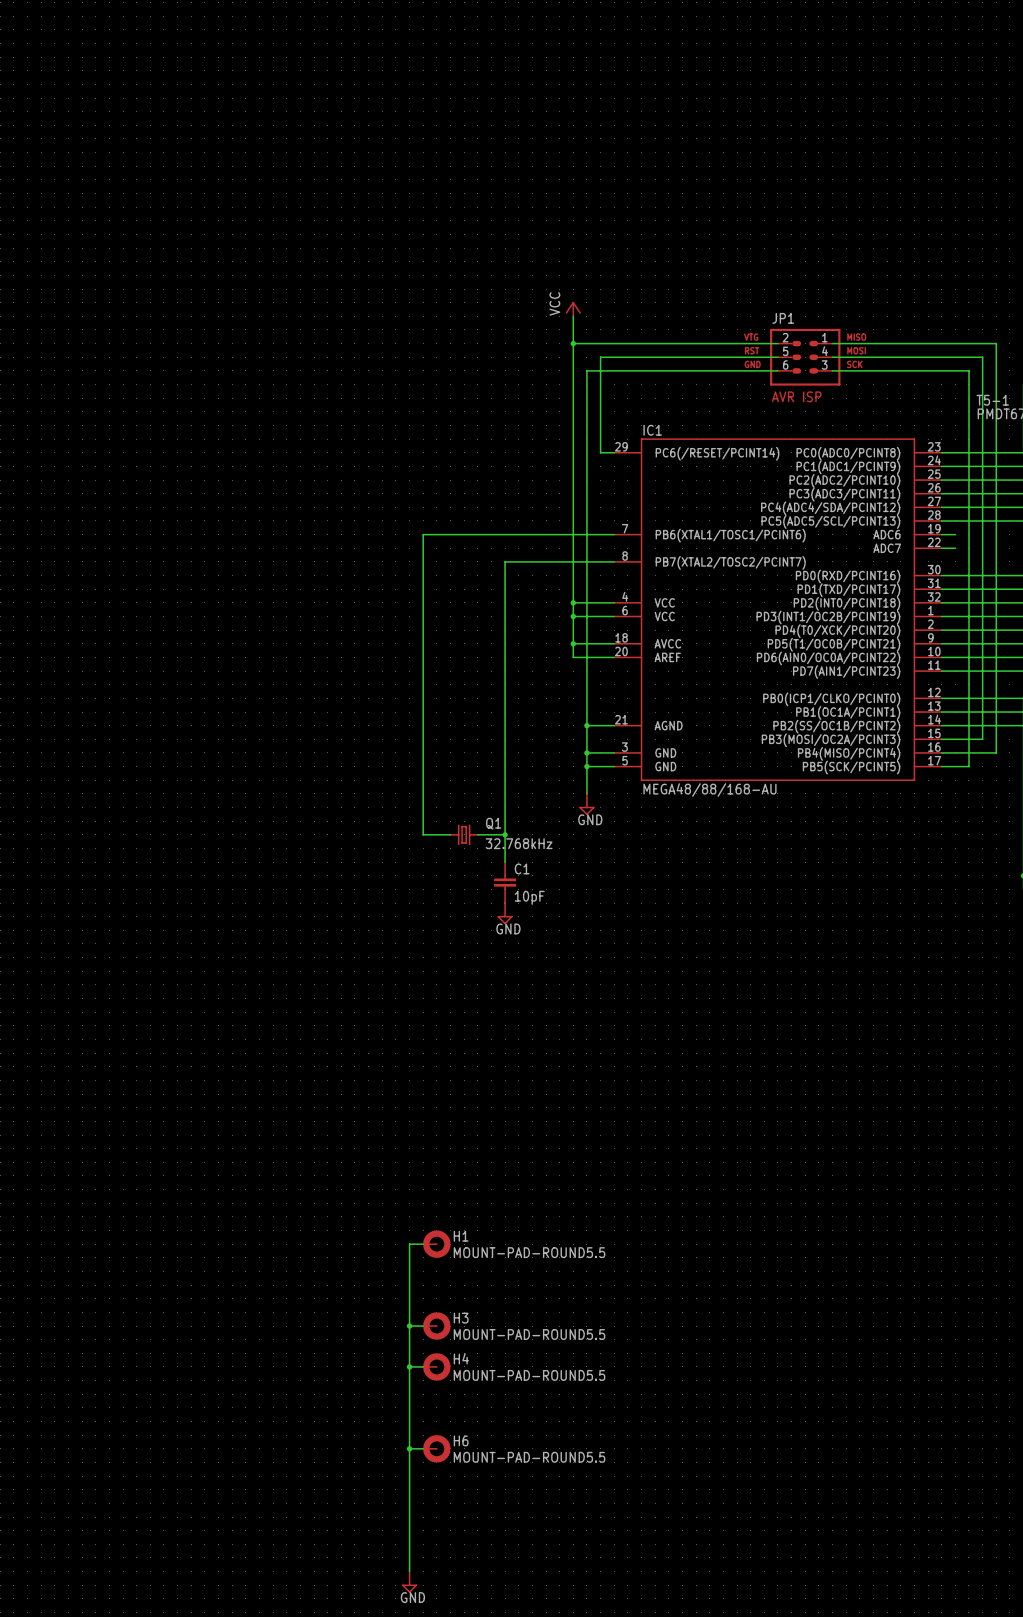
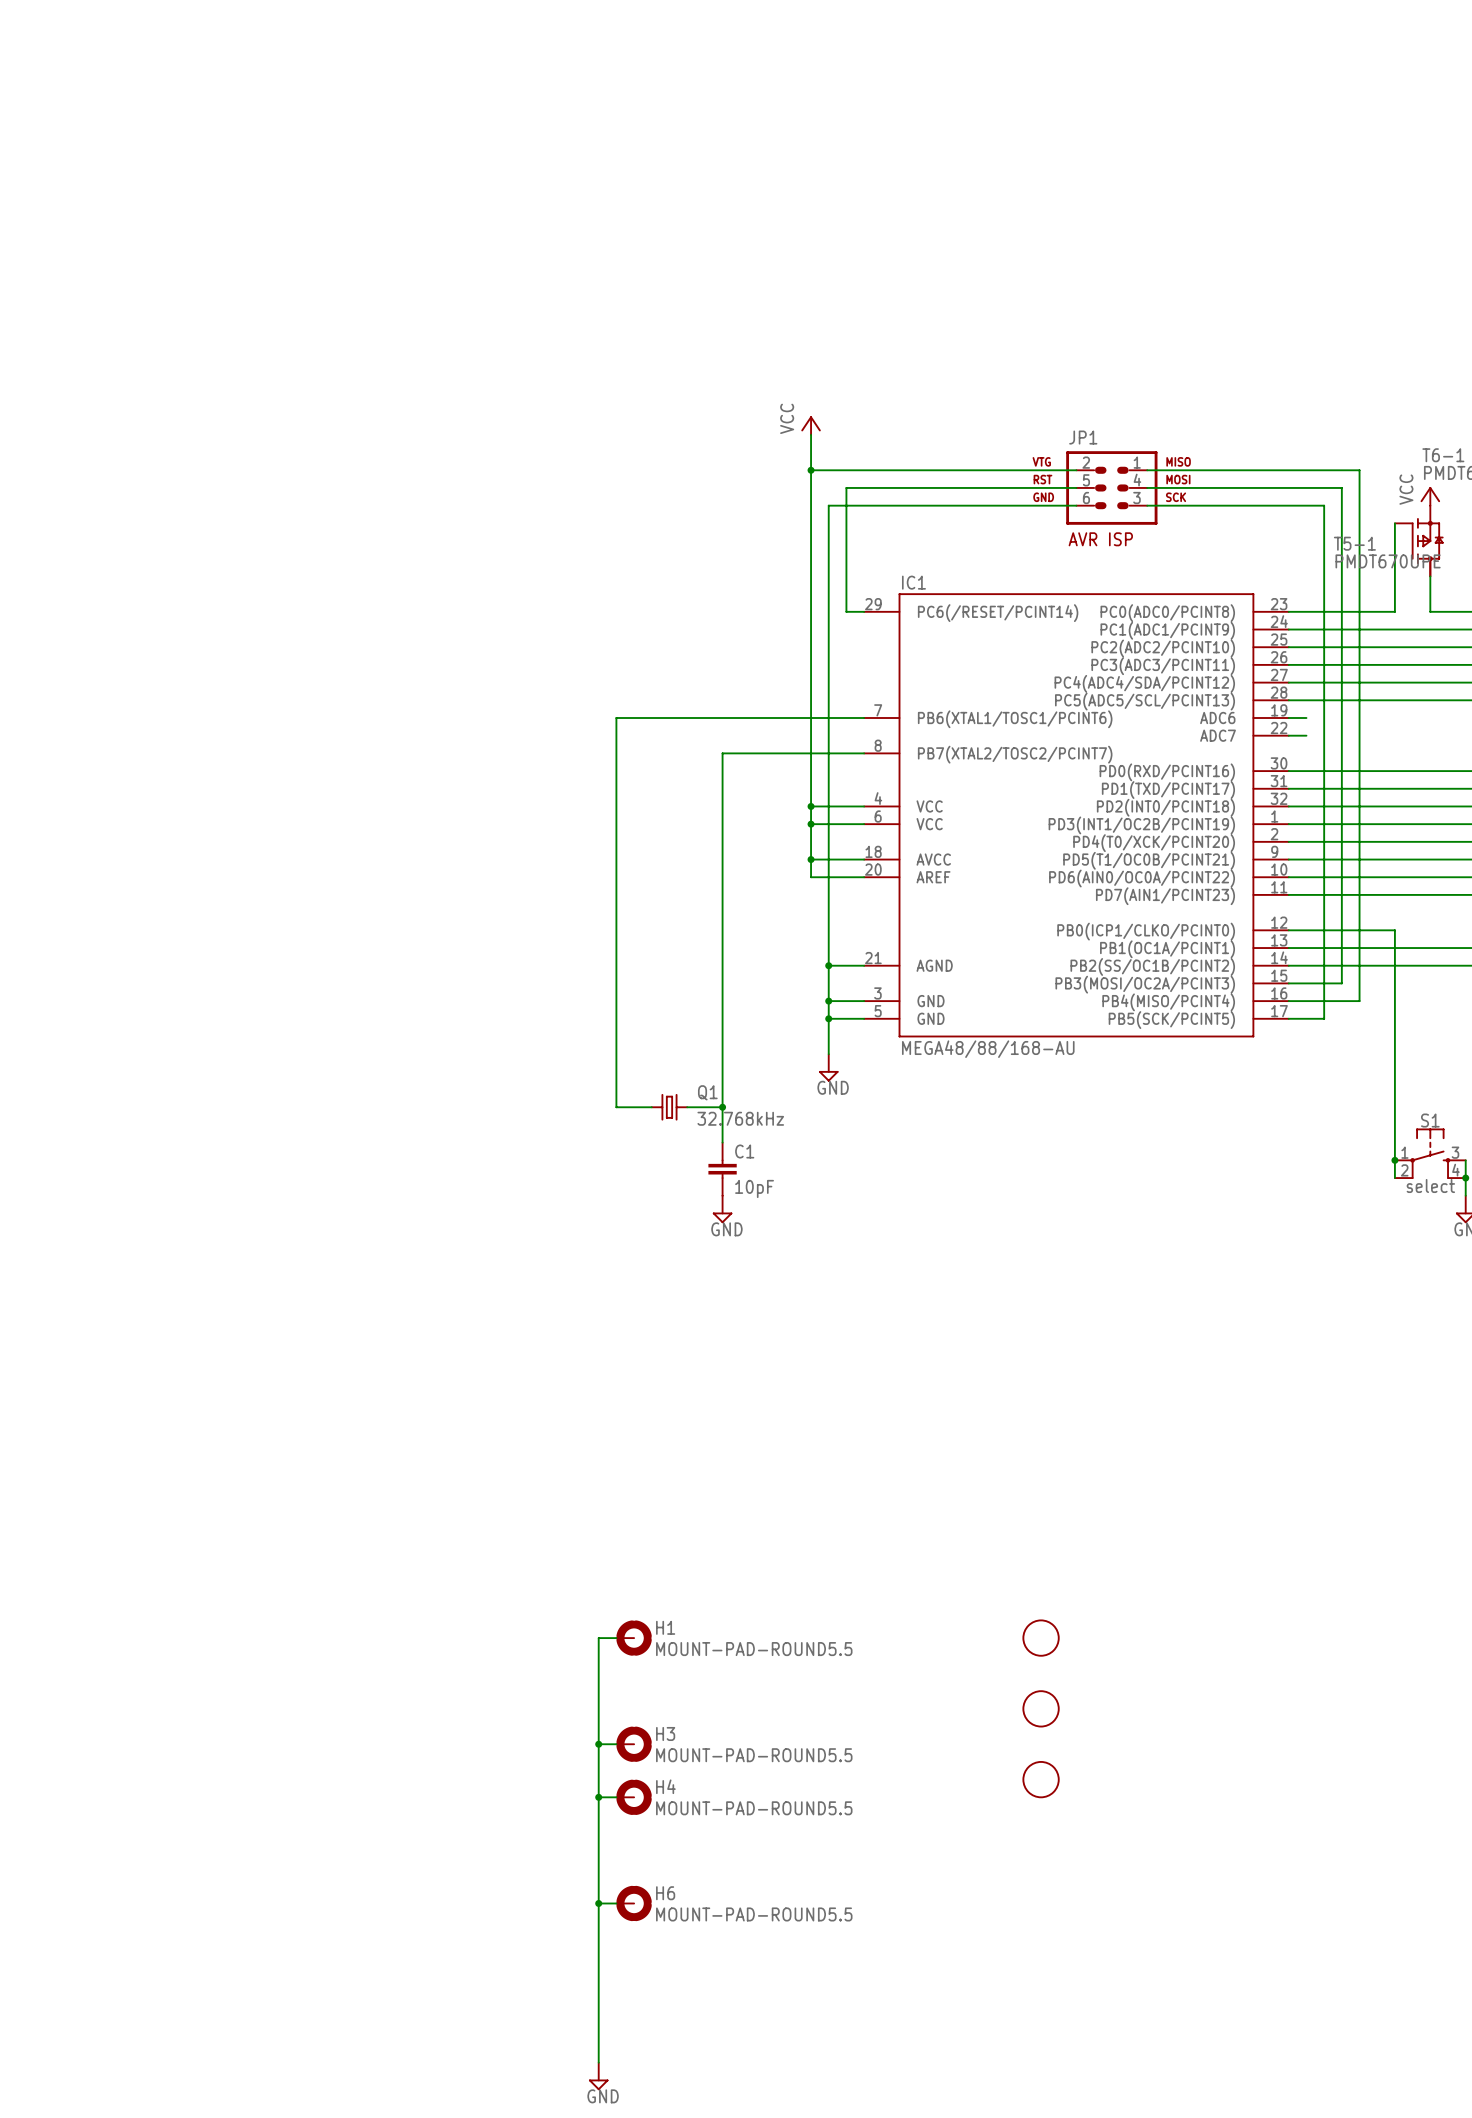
part: none -> (1041, 1638)
part: none -> (1041, 1708)
part: none -> (1041, 1779)

